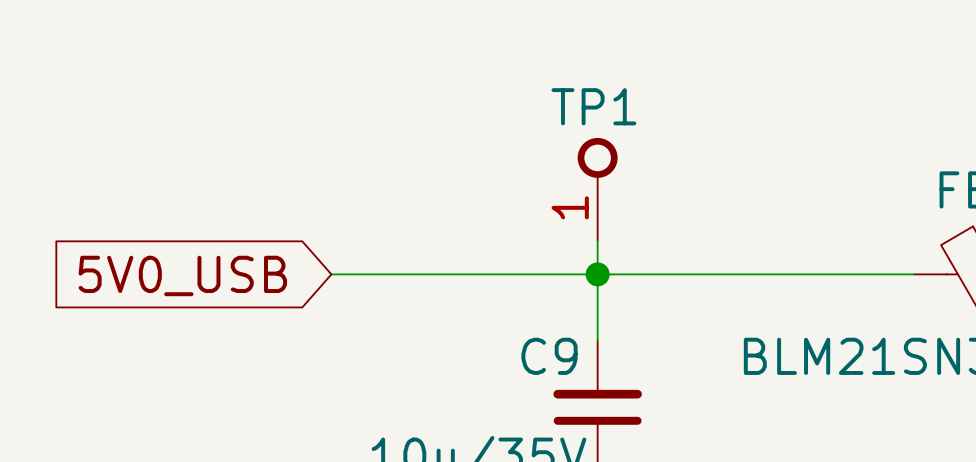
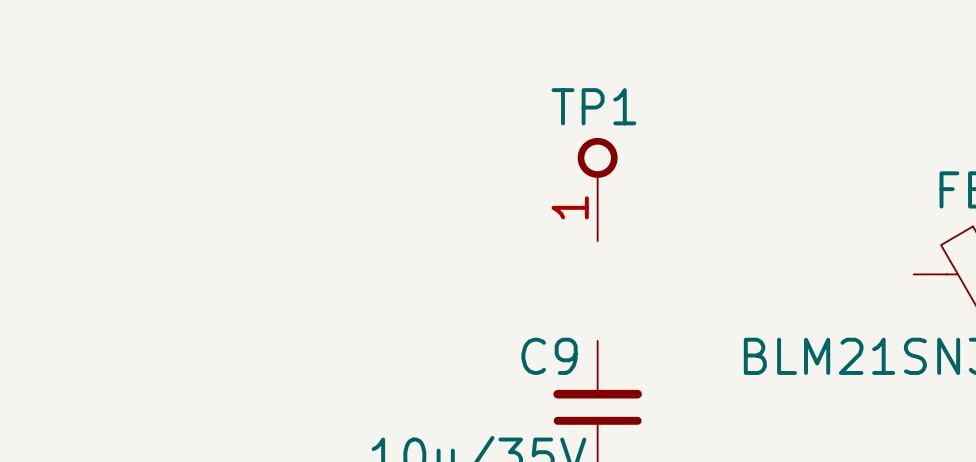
wire: (597, 241) (597, 340) -> none
wire: (331, 274) (913, 274) -> none
junction: (597, 274) -> none
global label: 5V0_USB (182, 275) -> none

